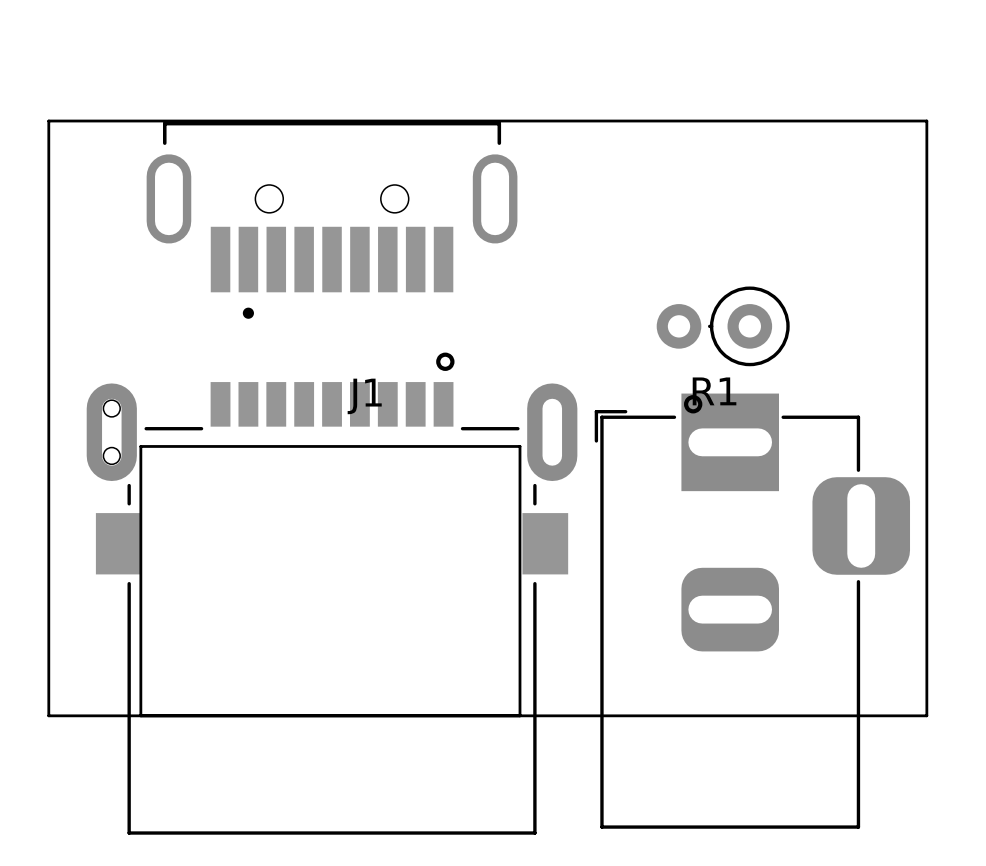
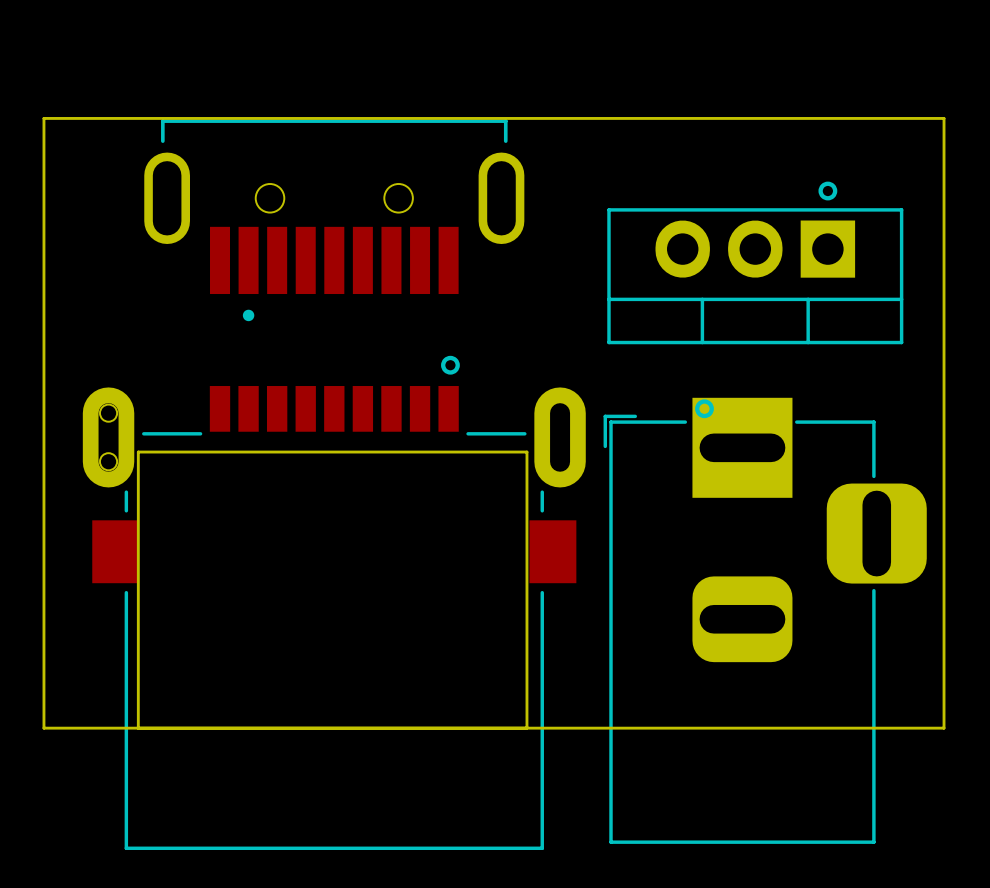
drawing: none -> [818, 181, 838, 201]
part: none -> (755, 276)
R1: (723, 326) -> none
J1 name: J1 (364, 396) -> none

